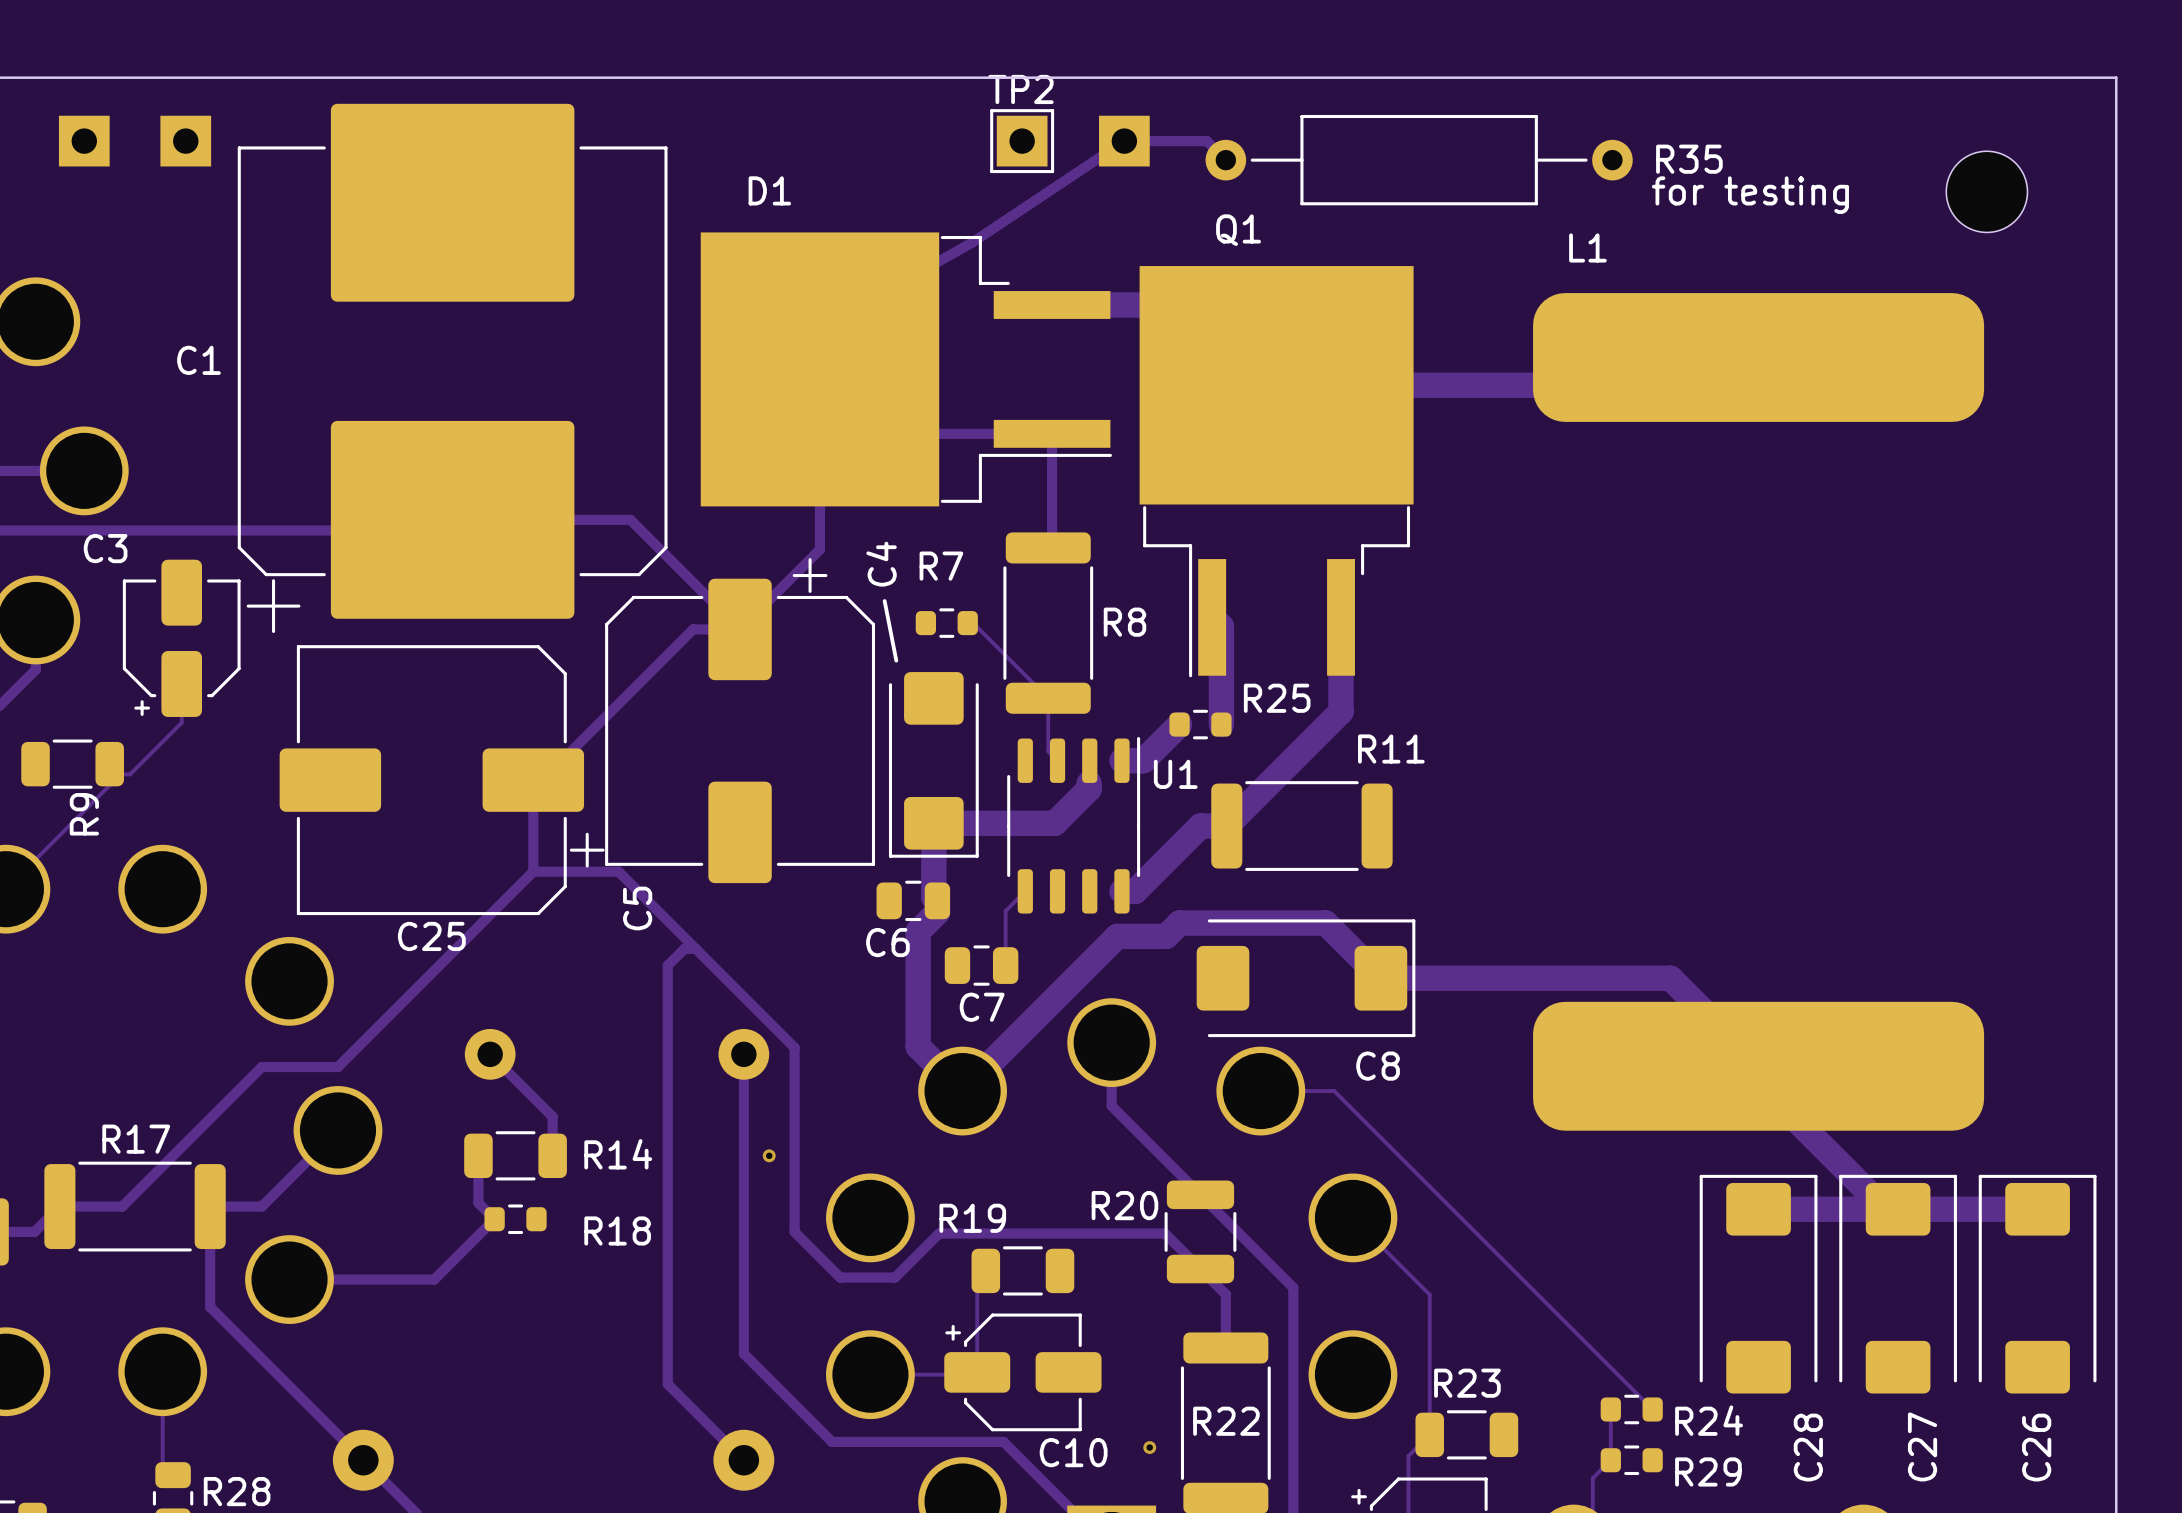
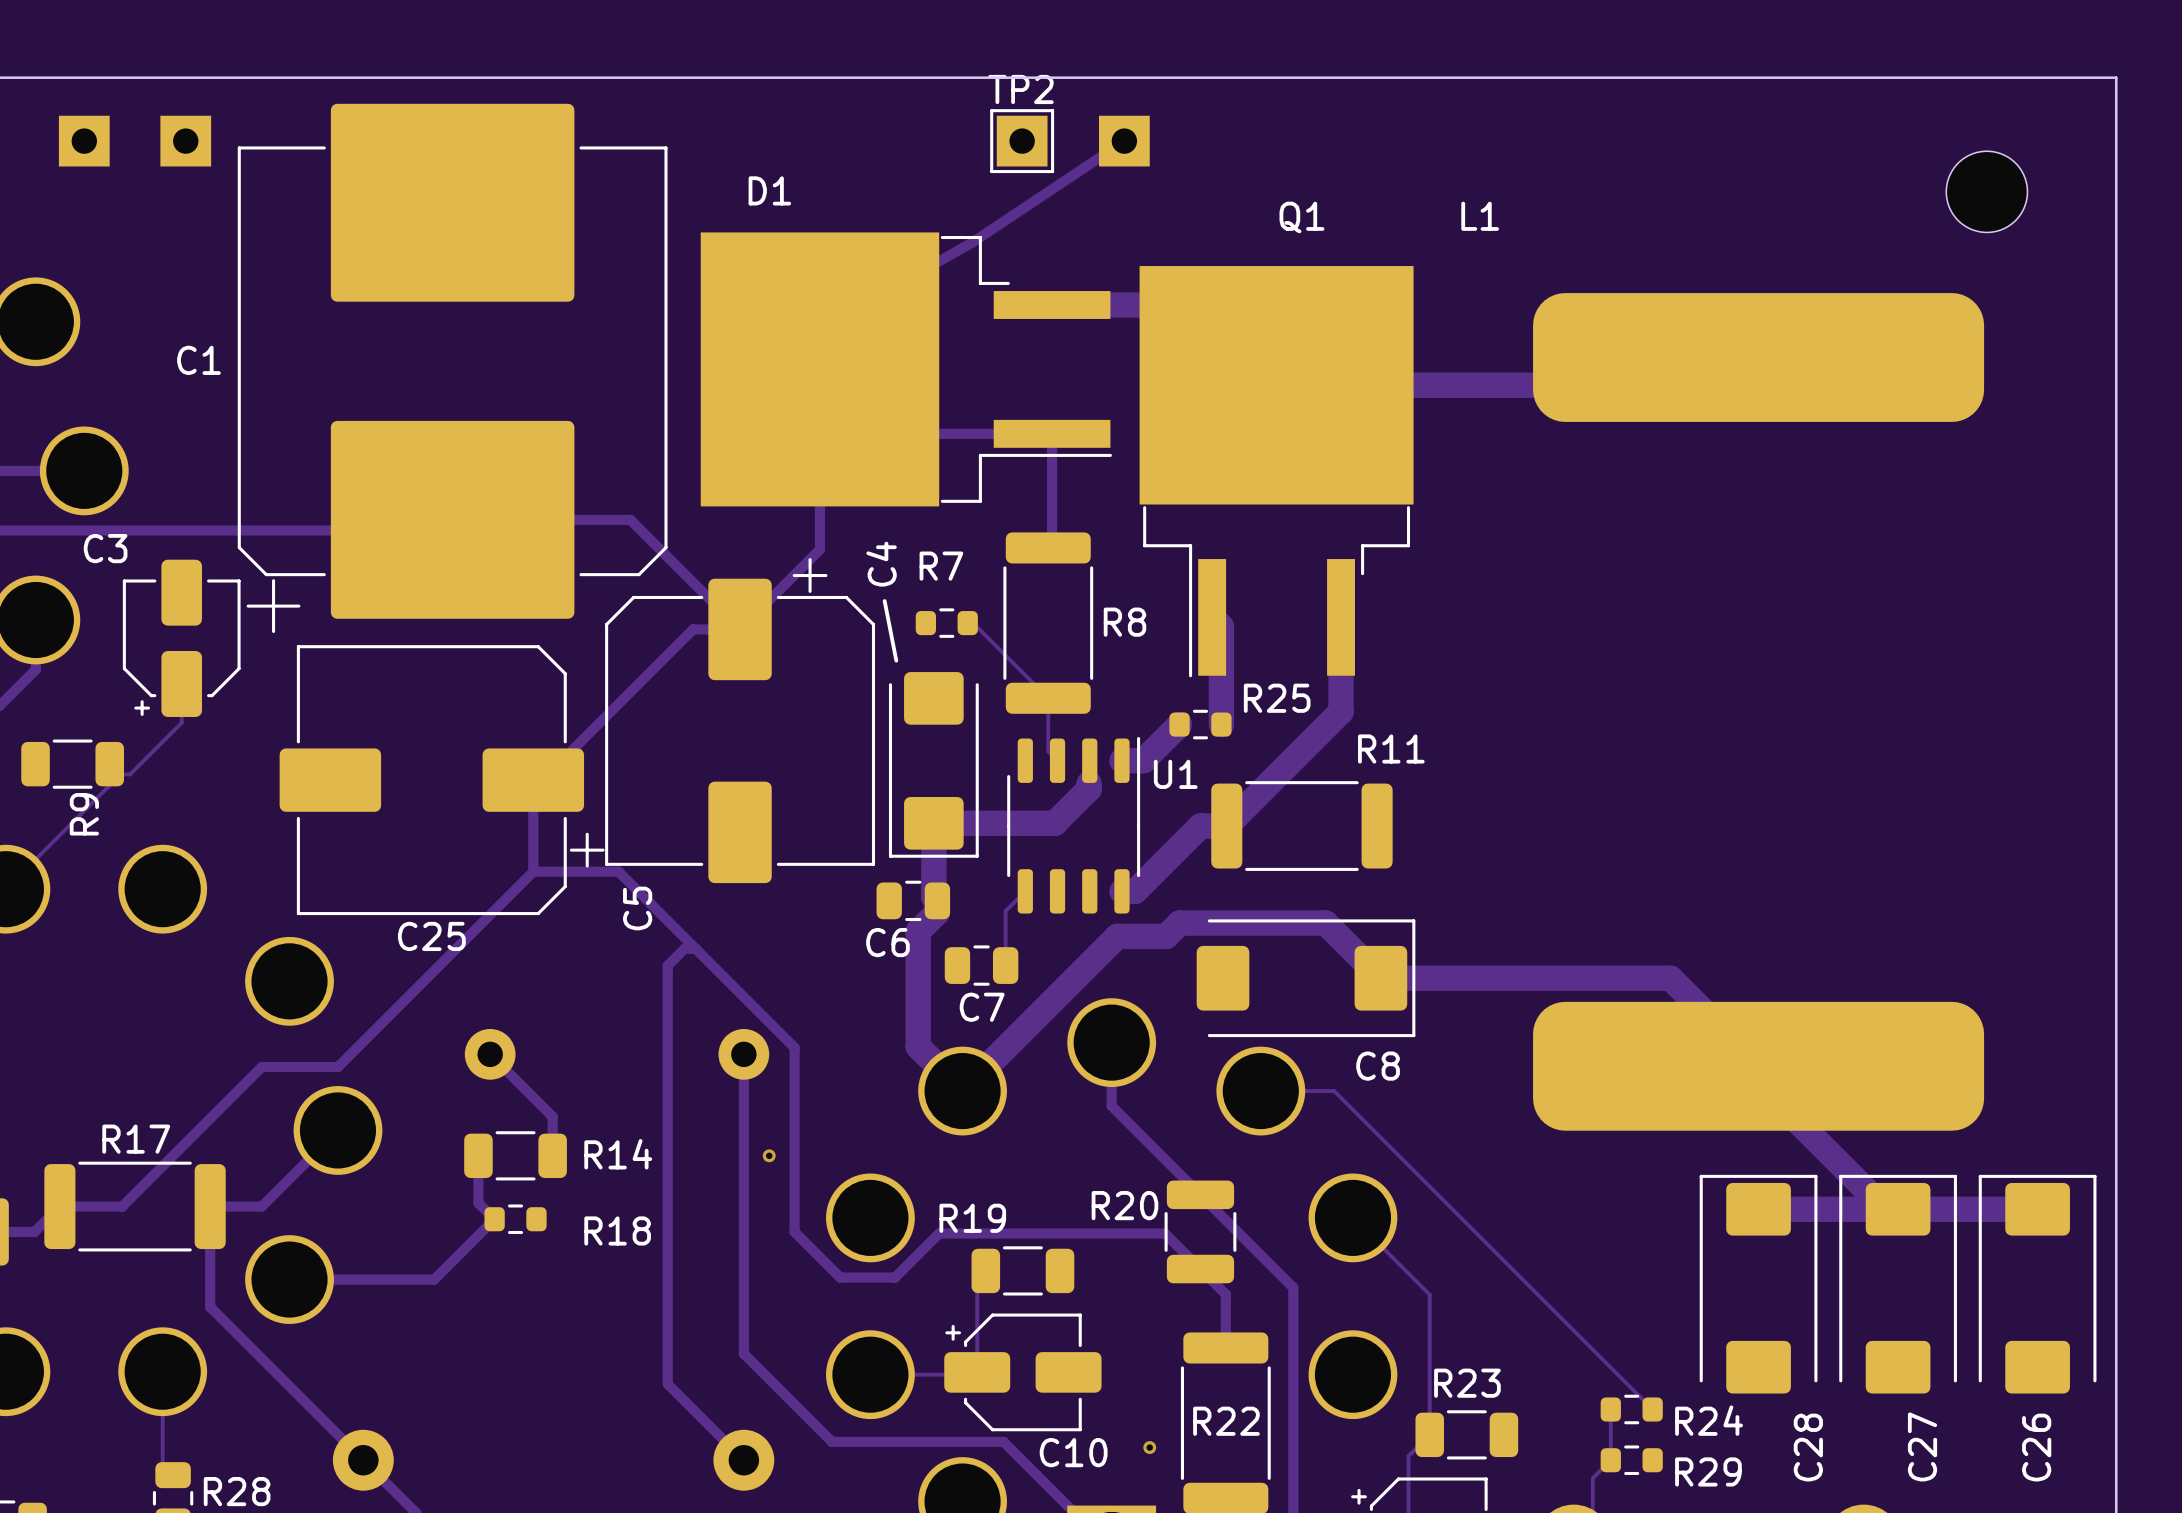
track: (1124, 141) (1206, 141) (1225, 160) -> none
R35: (1419, 160) -> none
text: for testing (1750, 195) -> none
Q1 name position: Q1 (1238, 230) -> Q1 (1301, 217)
L1 name position: L1 (1587, 247) -> L1 (1480, 216)

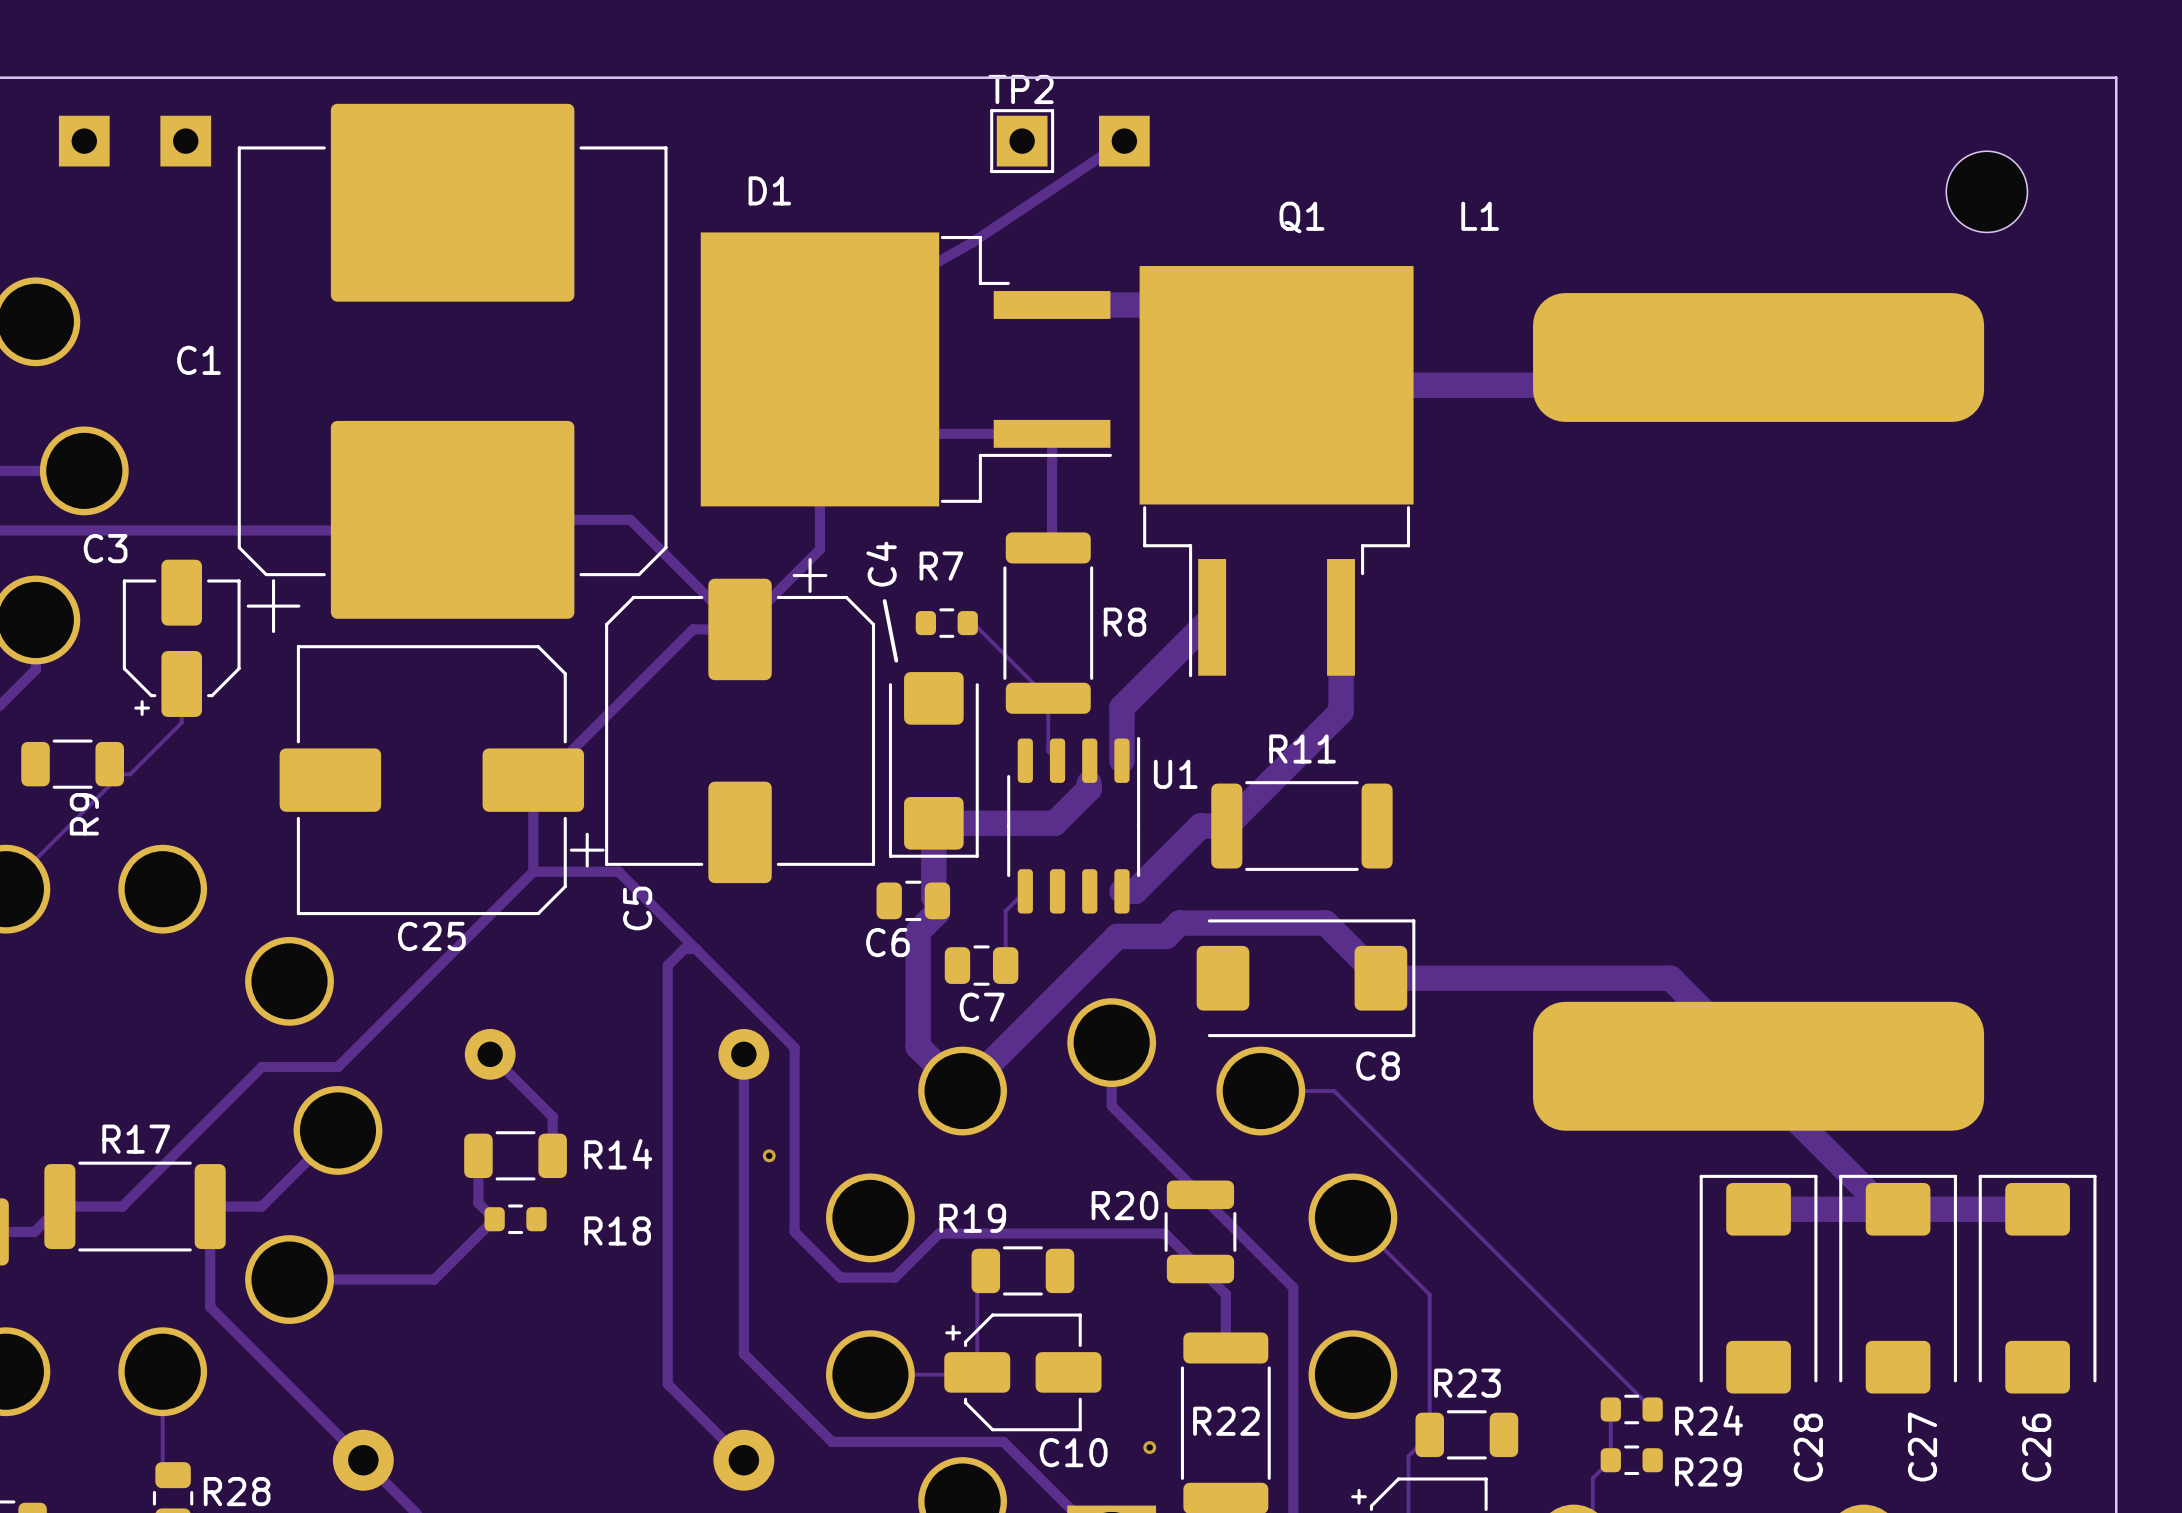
track: (1212, 617) (1221, 626) (1221, 724) -> (1212, 617) (1121, 707) (1121, 760)
track: (1179, 724) (1143, 760) (1121, 760) -> none
R25: (1200, 724) -> none
R11 name position: R11 (1391, 748) -> R11 (1302, 748)

